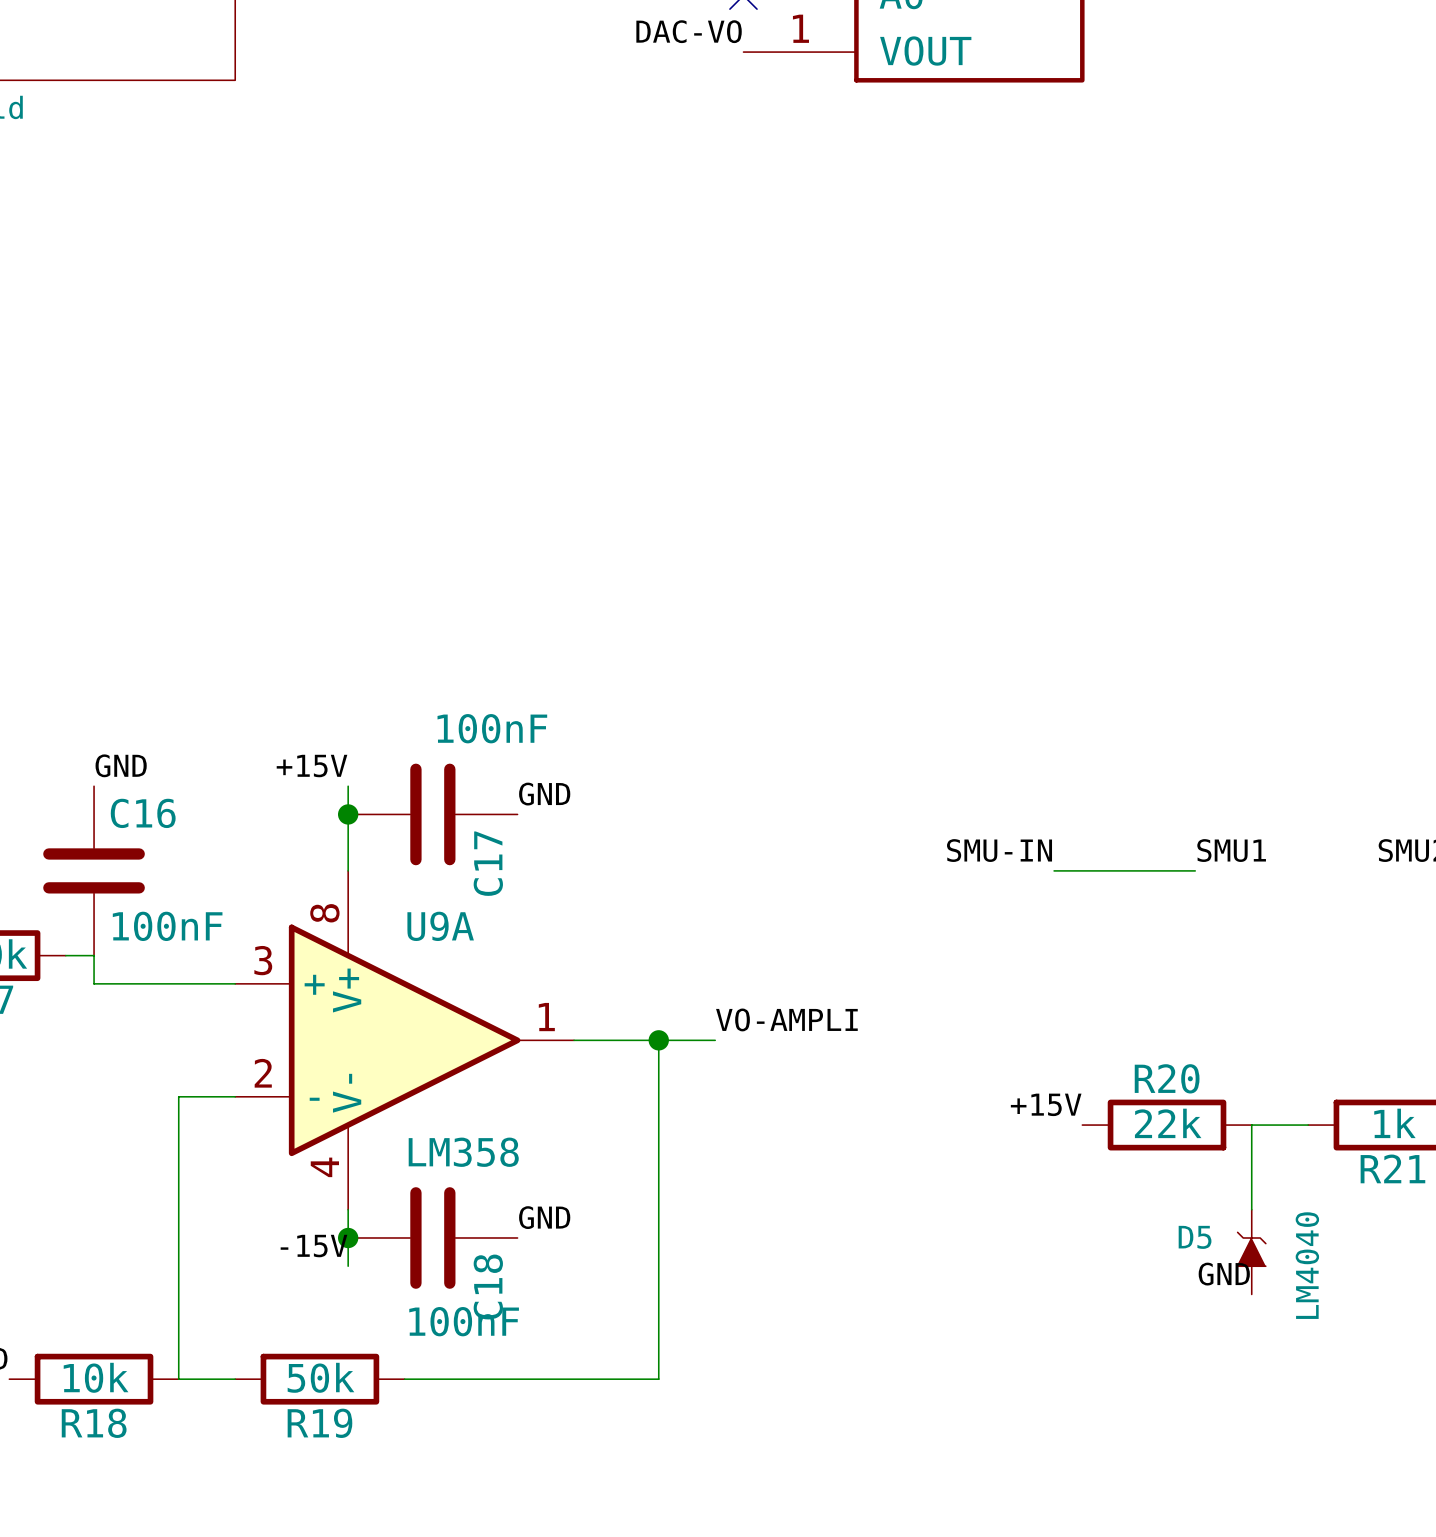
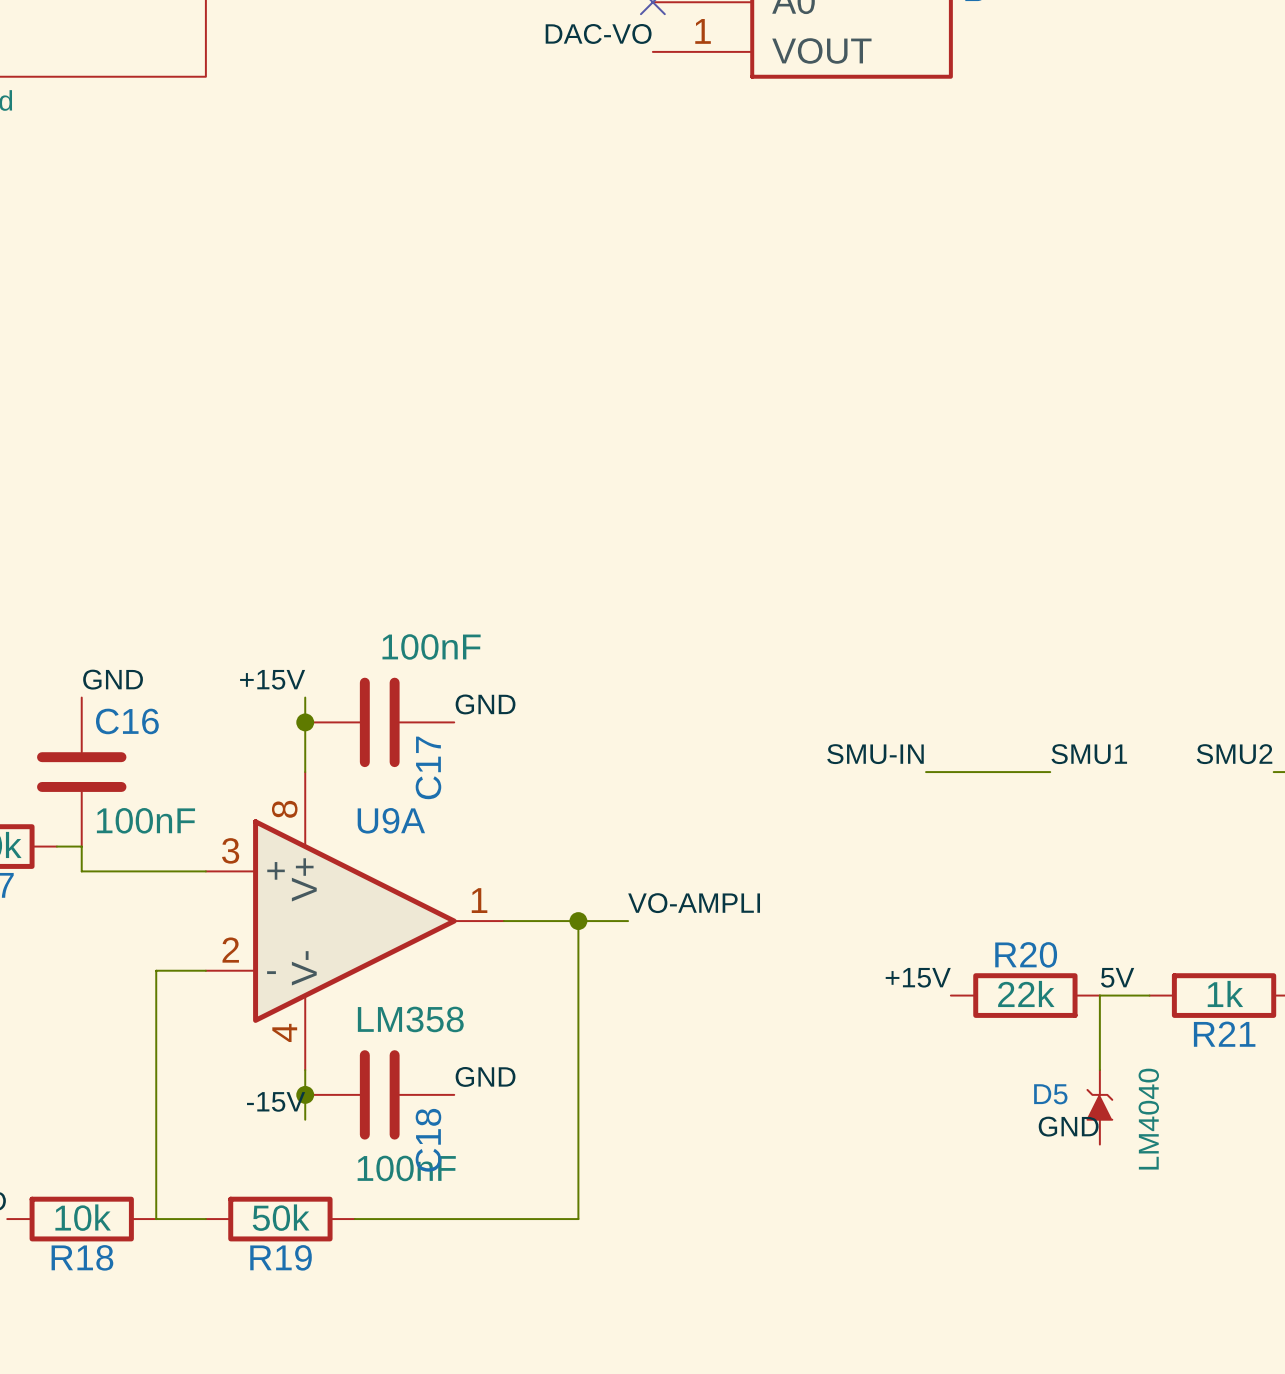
label: none -> 5V (1117, 977)

